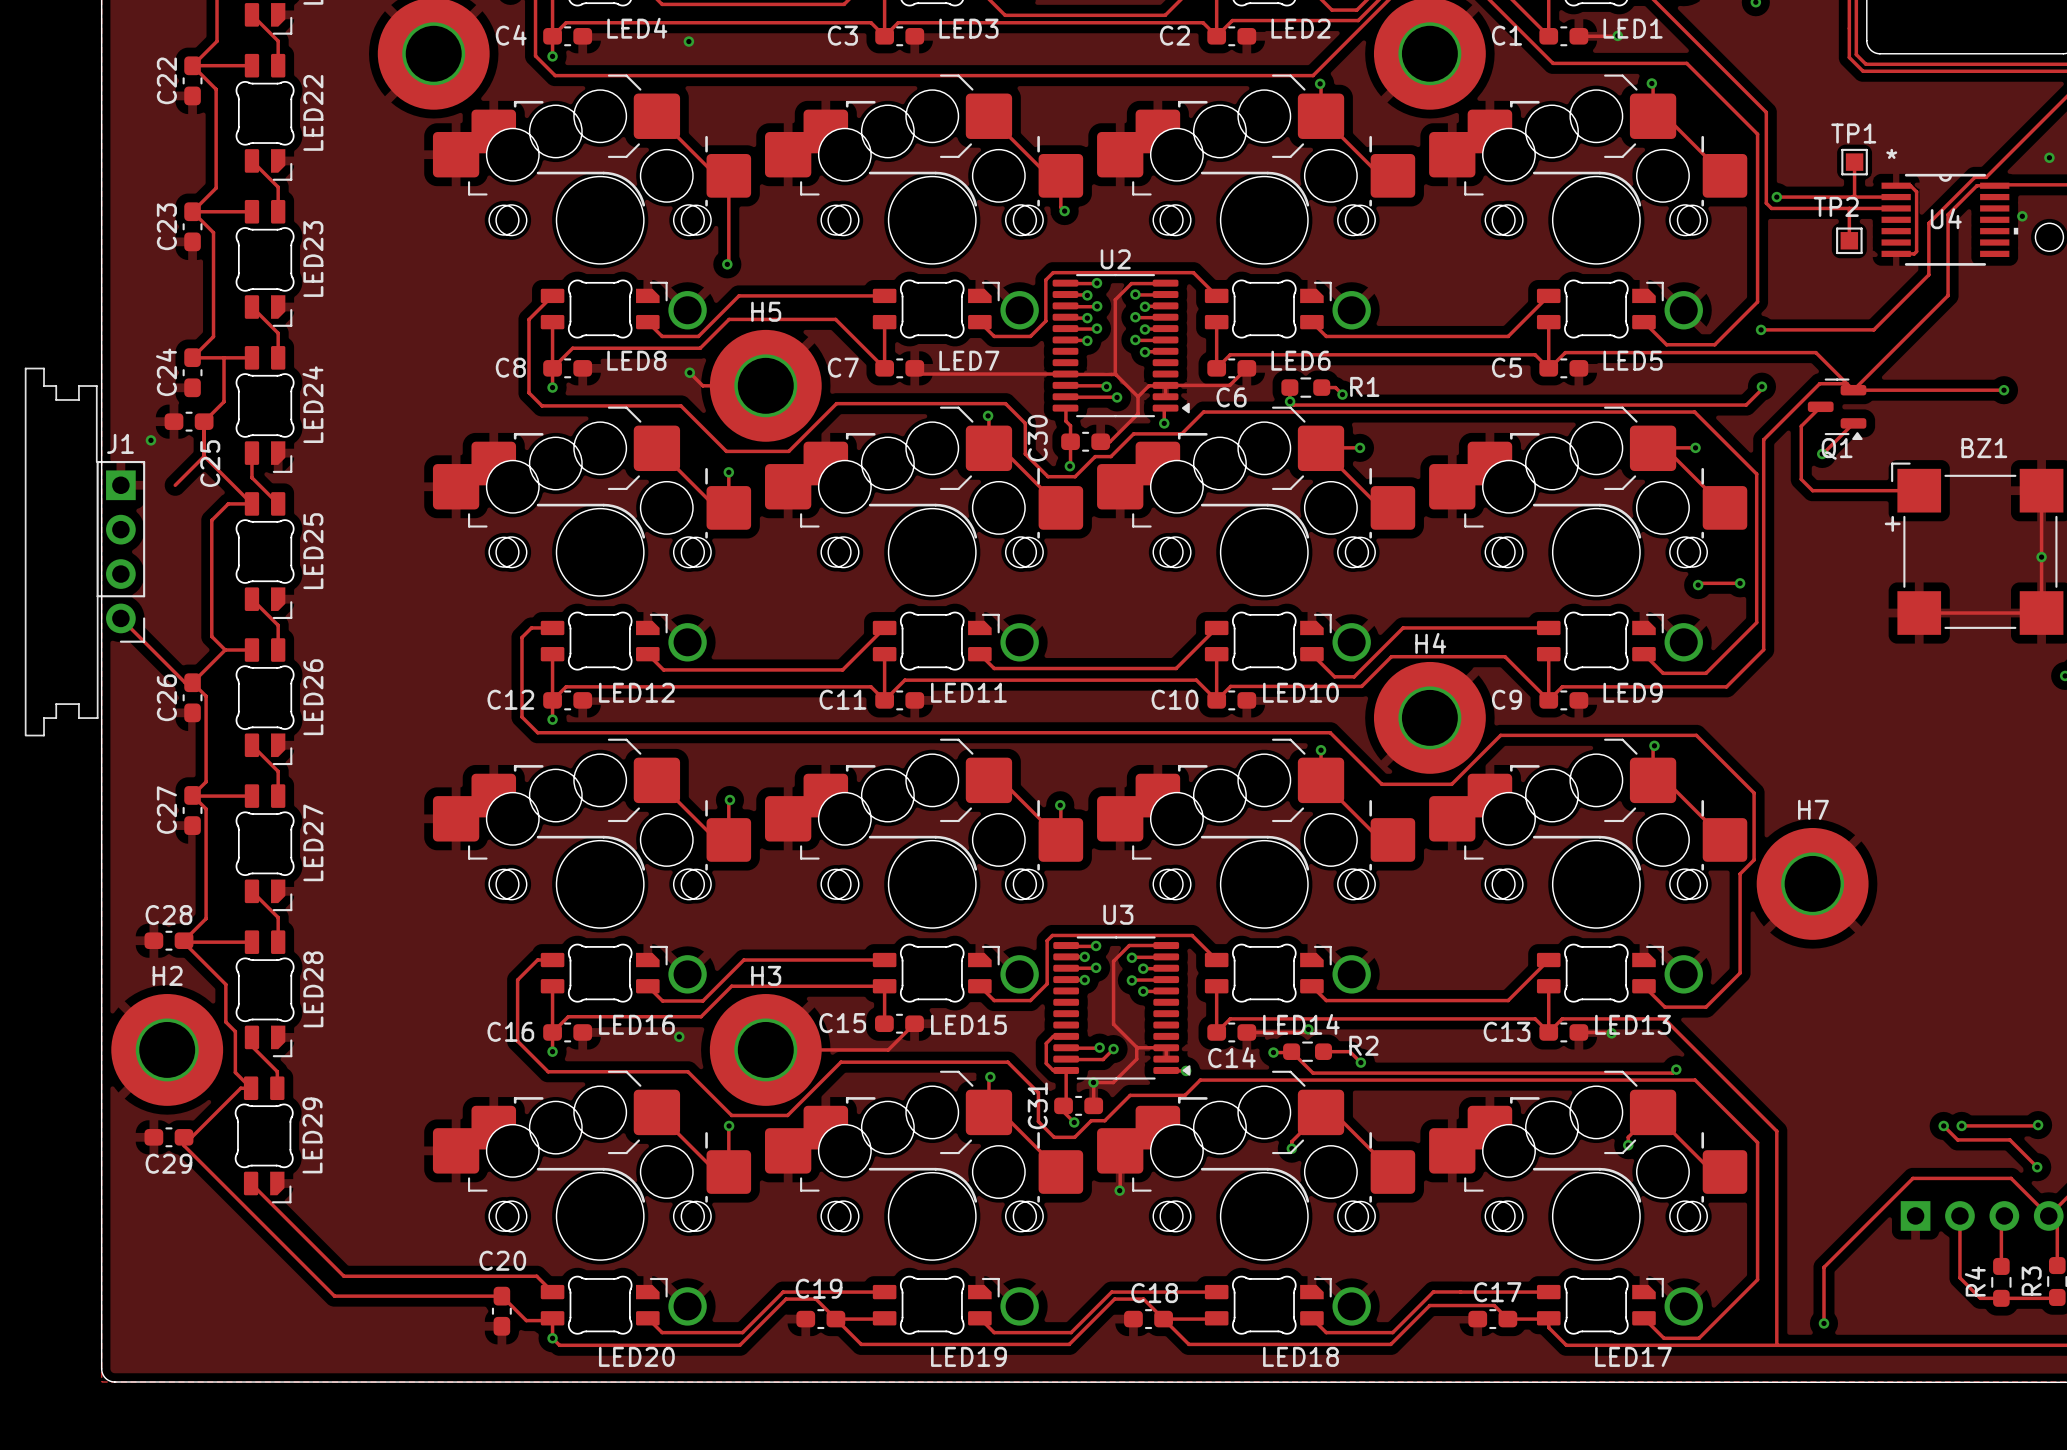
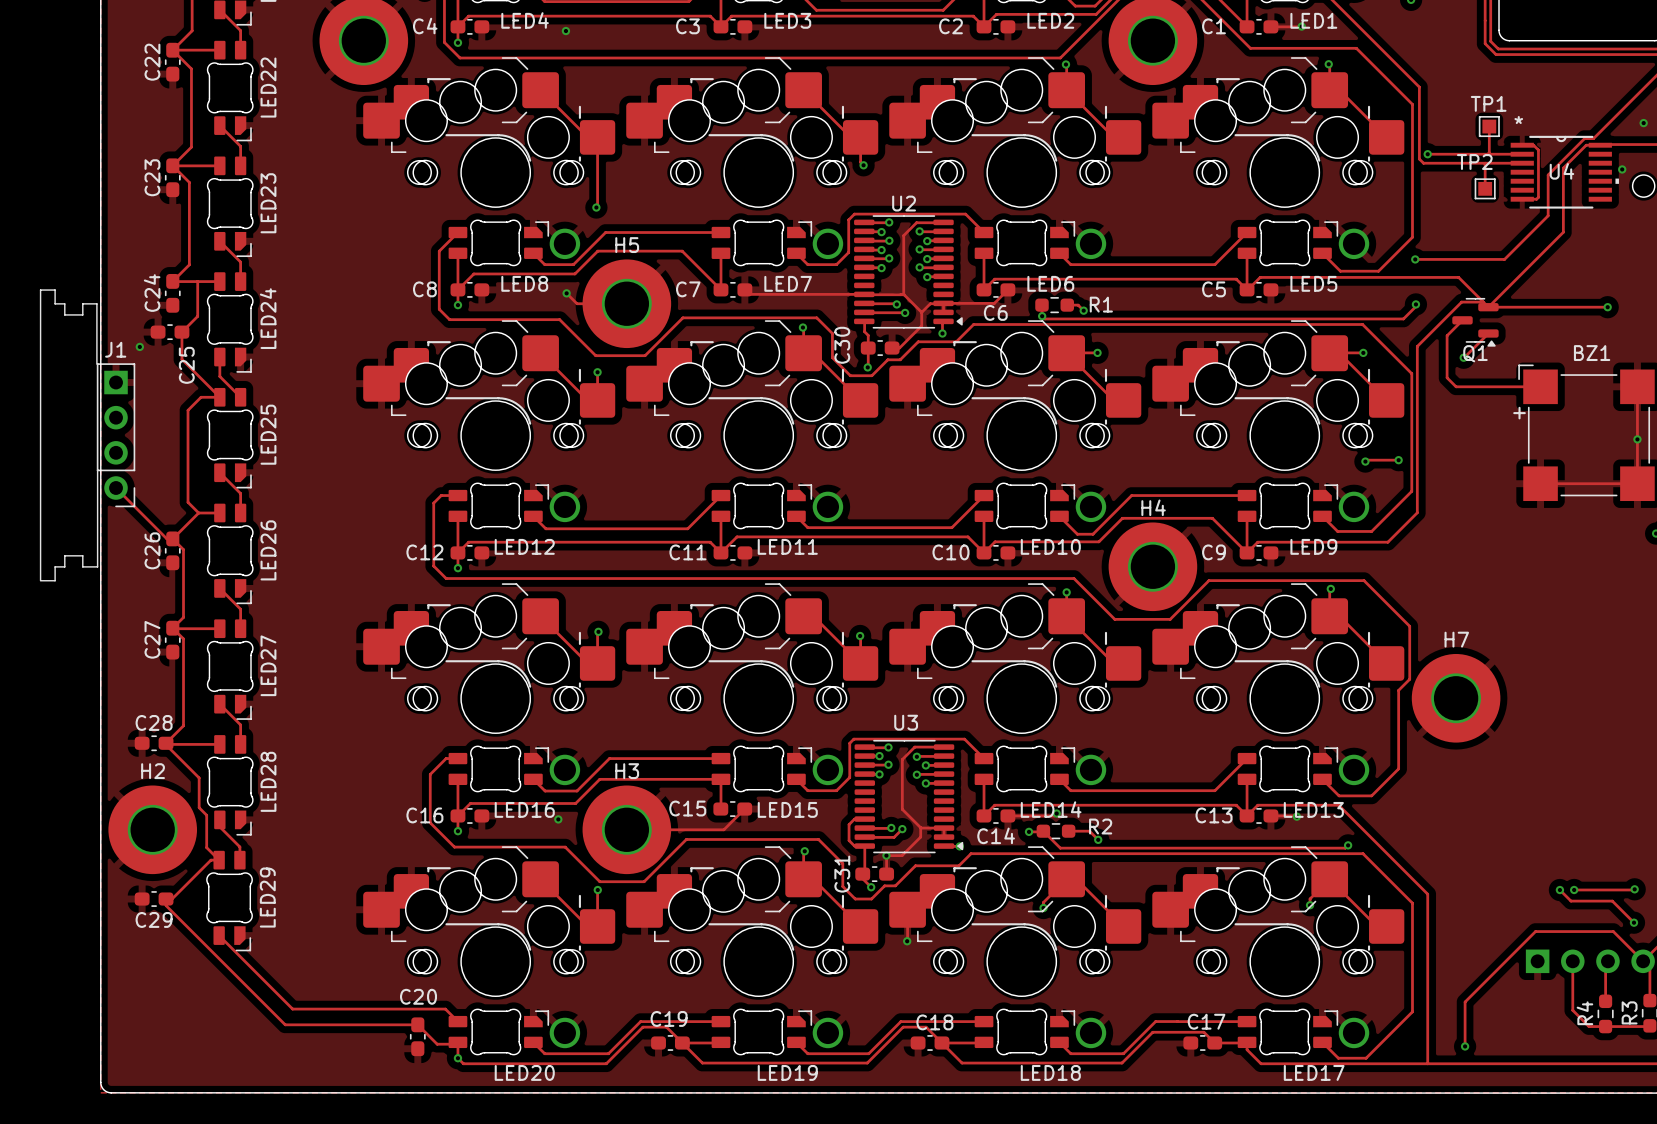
track: (204, 456) (175, 485) -> none

